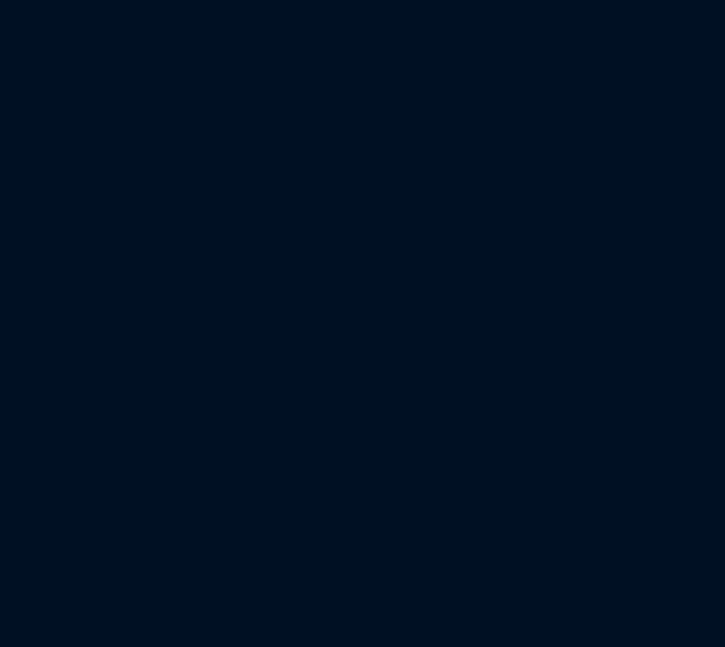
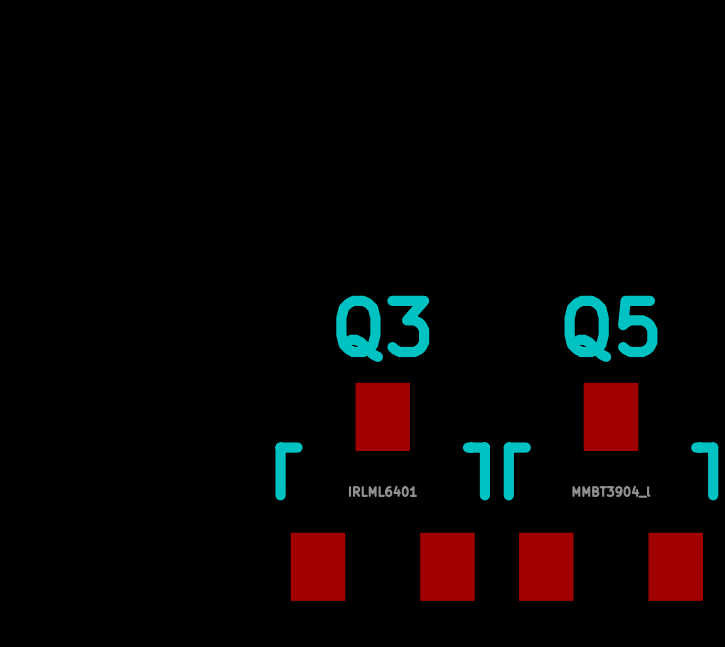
Q3: none -> IRLML6401 (382, 491)
Q5: none -> MMBT3904_l (611, 491)

